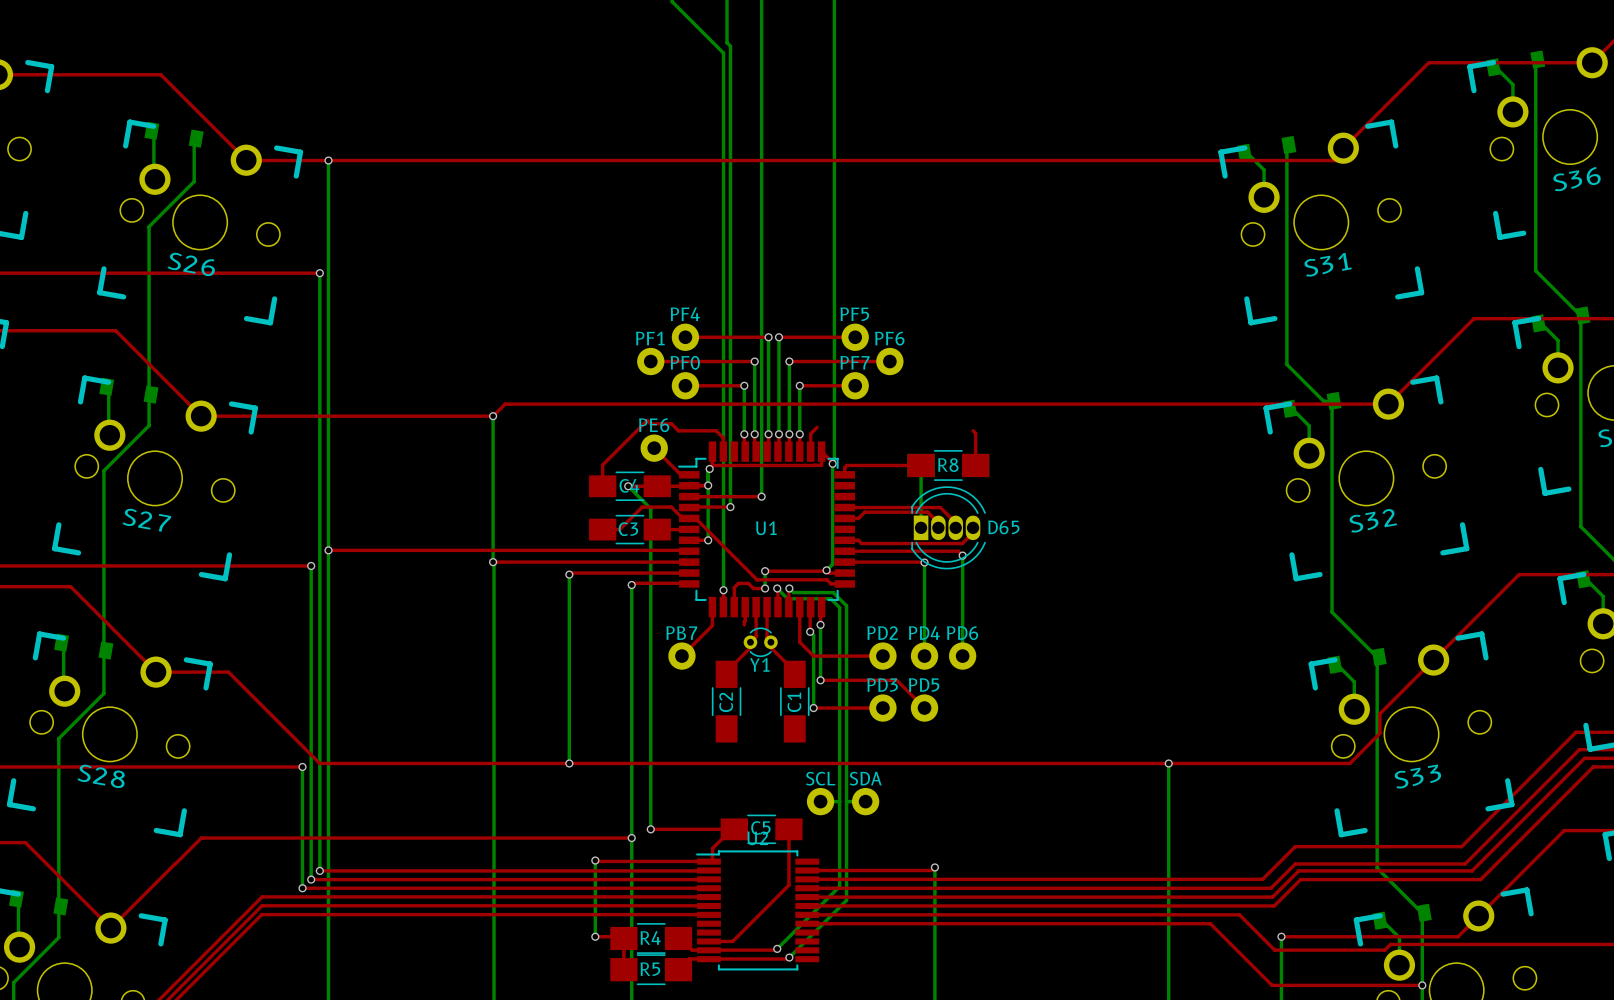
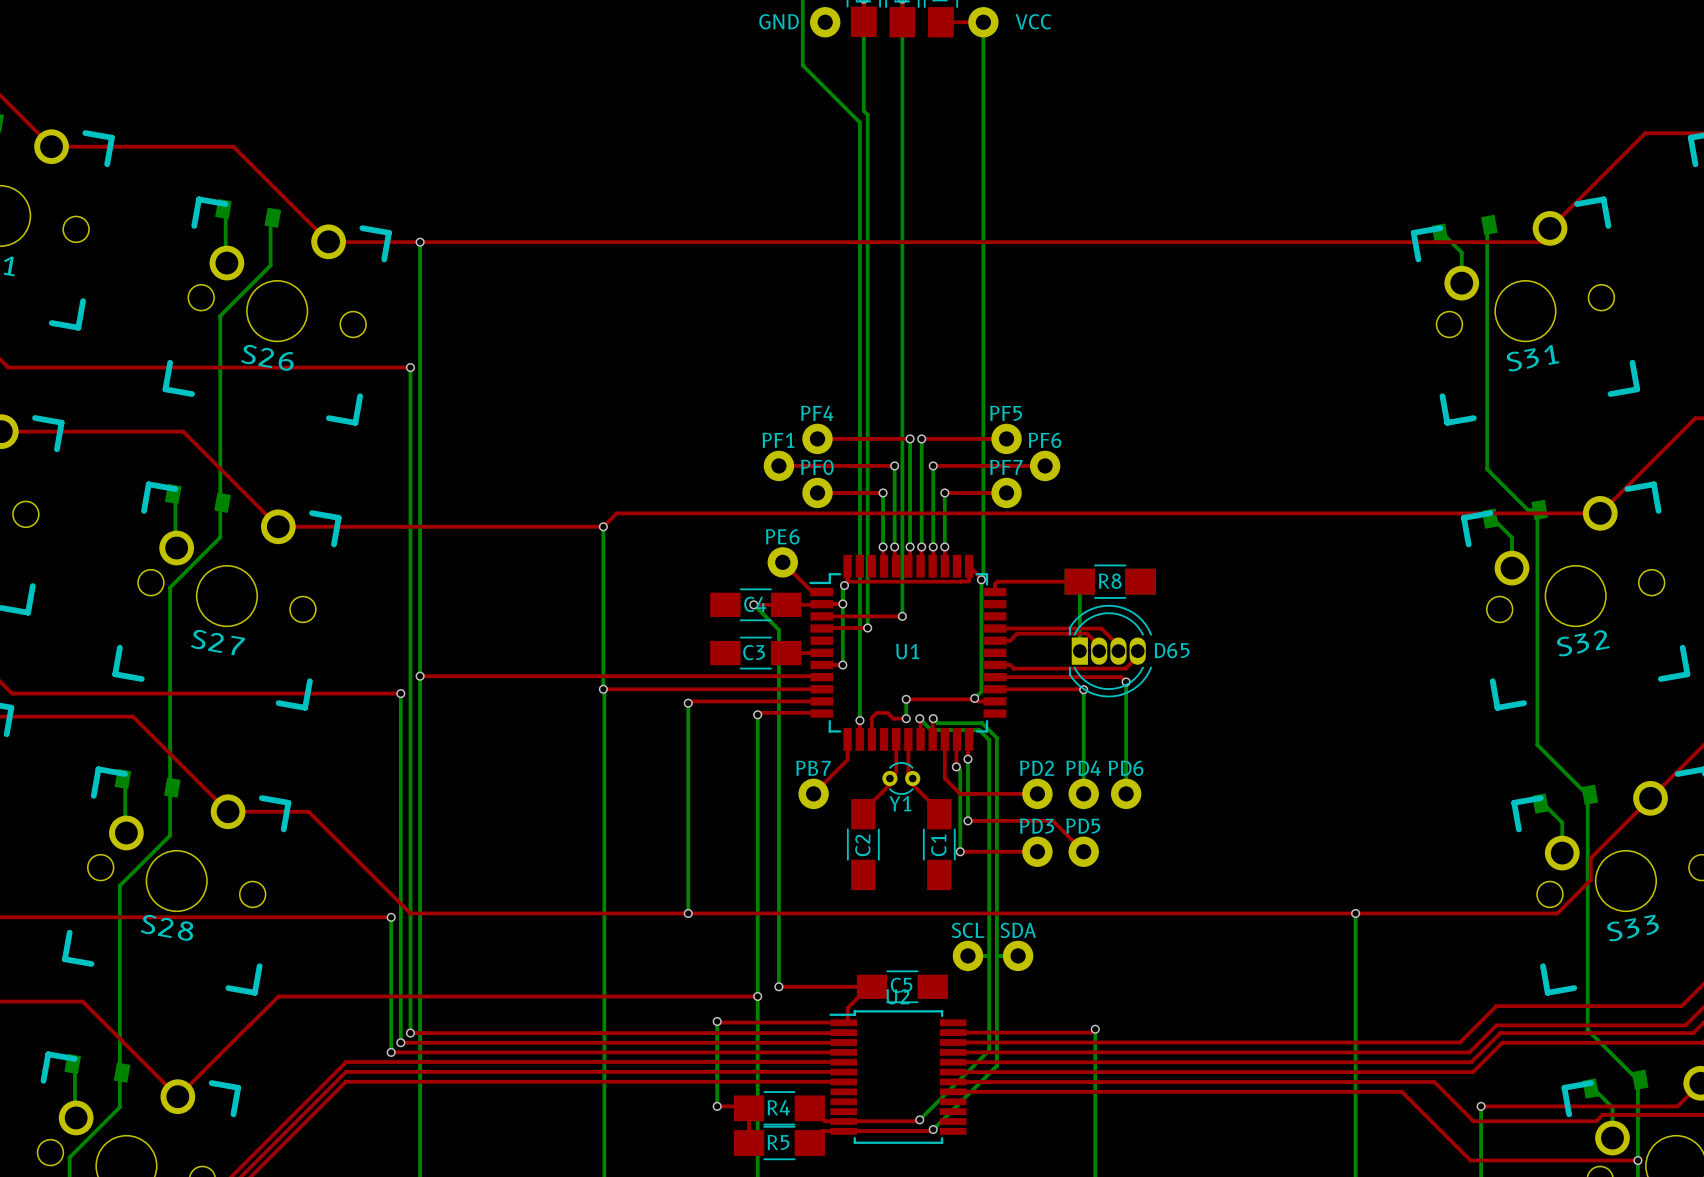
top track: (817, 427) (810, 433) (810, 451) -> none
top track: (973, 430) (975, 433) (975, 465) -> none
top track: (723, 451) (723, 437) (716, 430) (678, 430) (671, 423) (650, 423) (647, 420) (602, 465) (602, 486) -> none
top track: (602, 529) (619, 529) (642, 507) (671, 507) (682, 518) (695, 518) (757, 579) (827, 579) (831, 583) (844, 583) -> none
top track: (745, 607) (744, 624) -> none
top track: (788, 829) (788, 885) (732, 941) (709, 941) -> none

